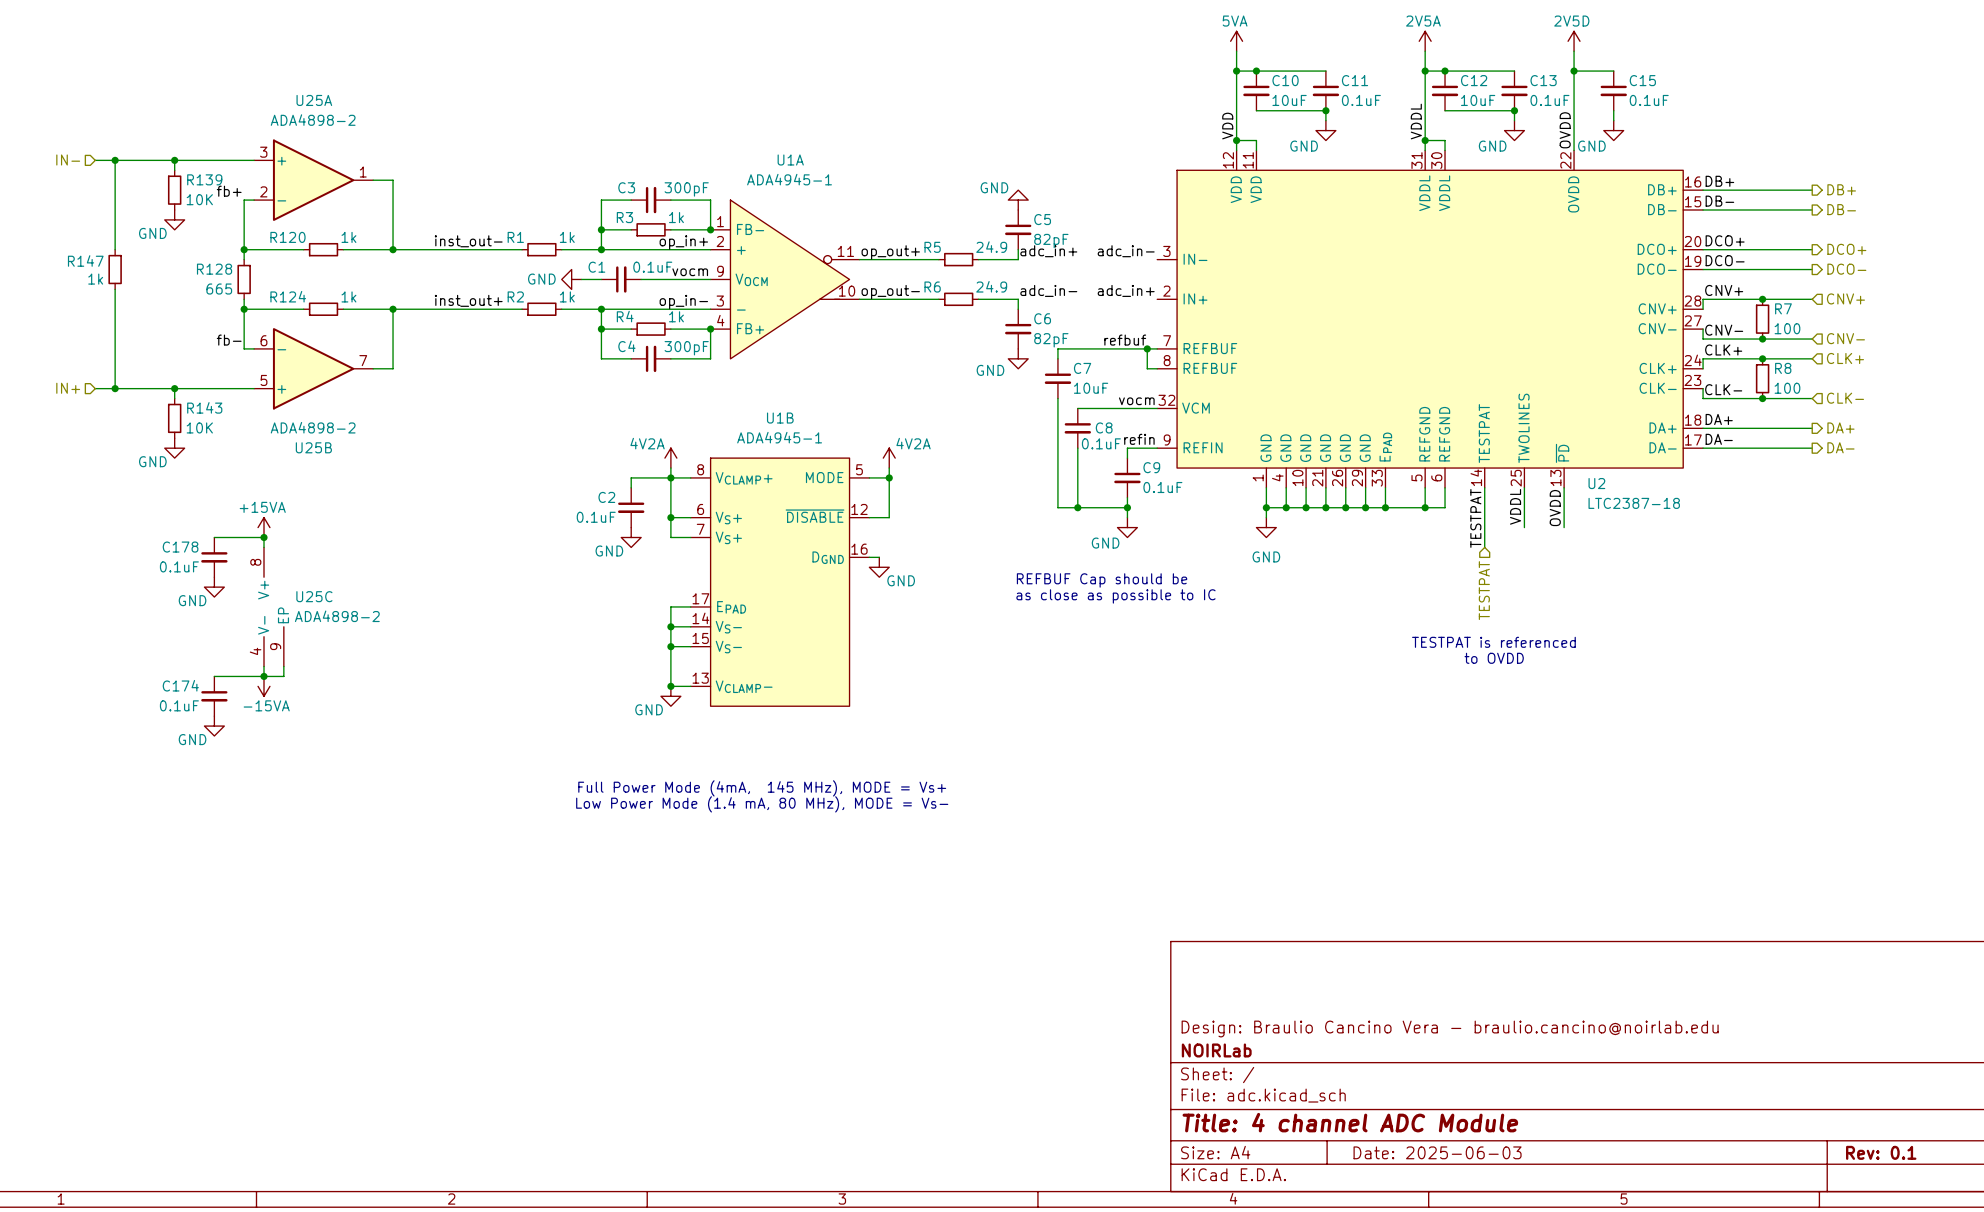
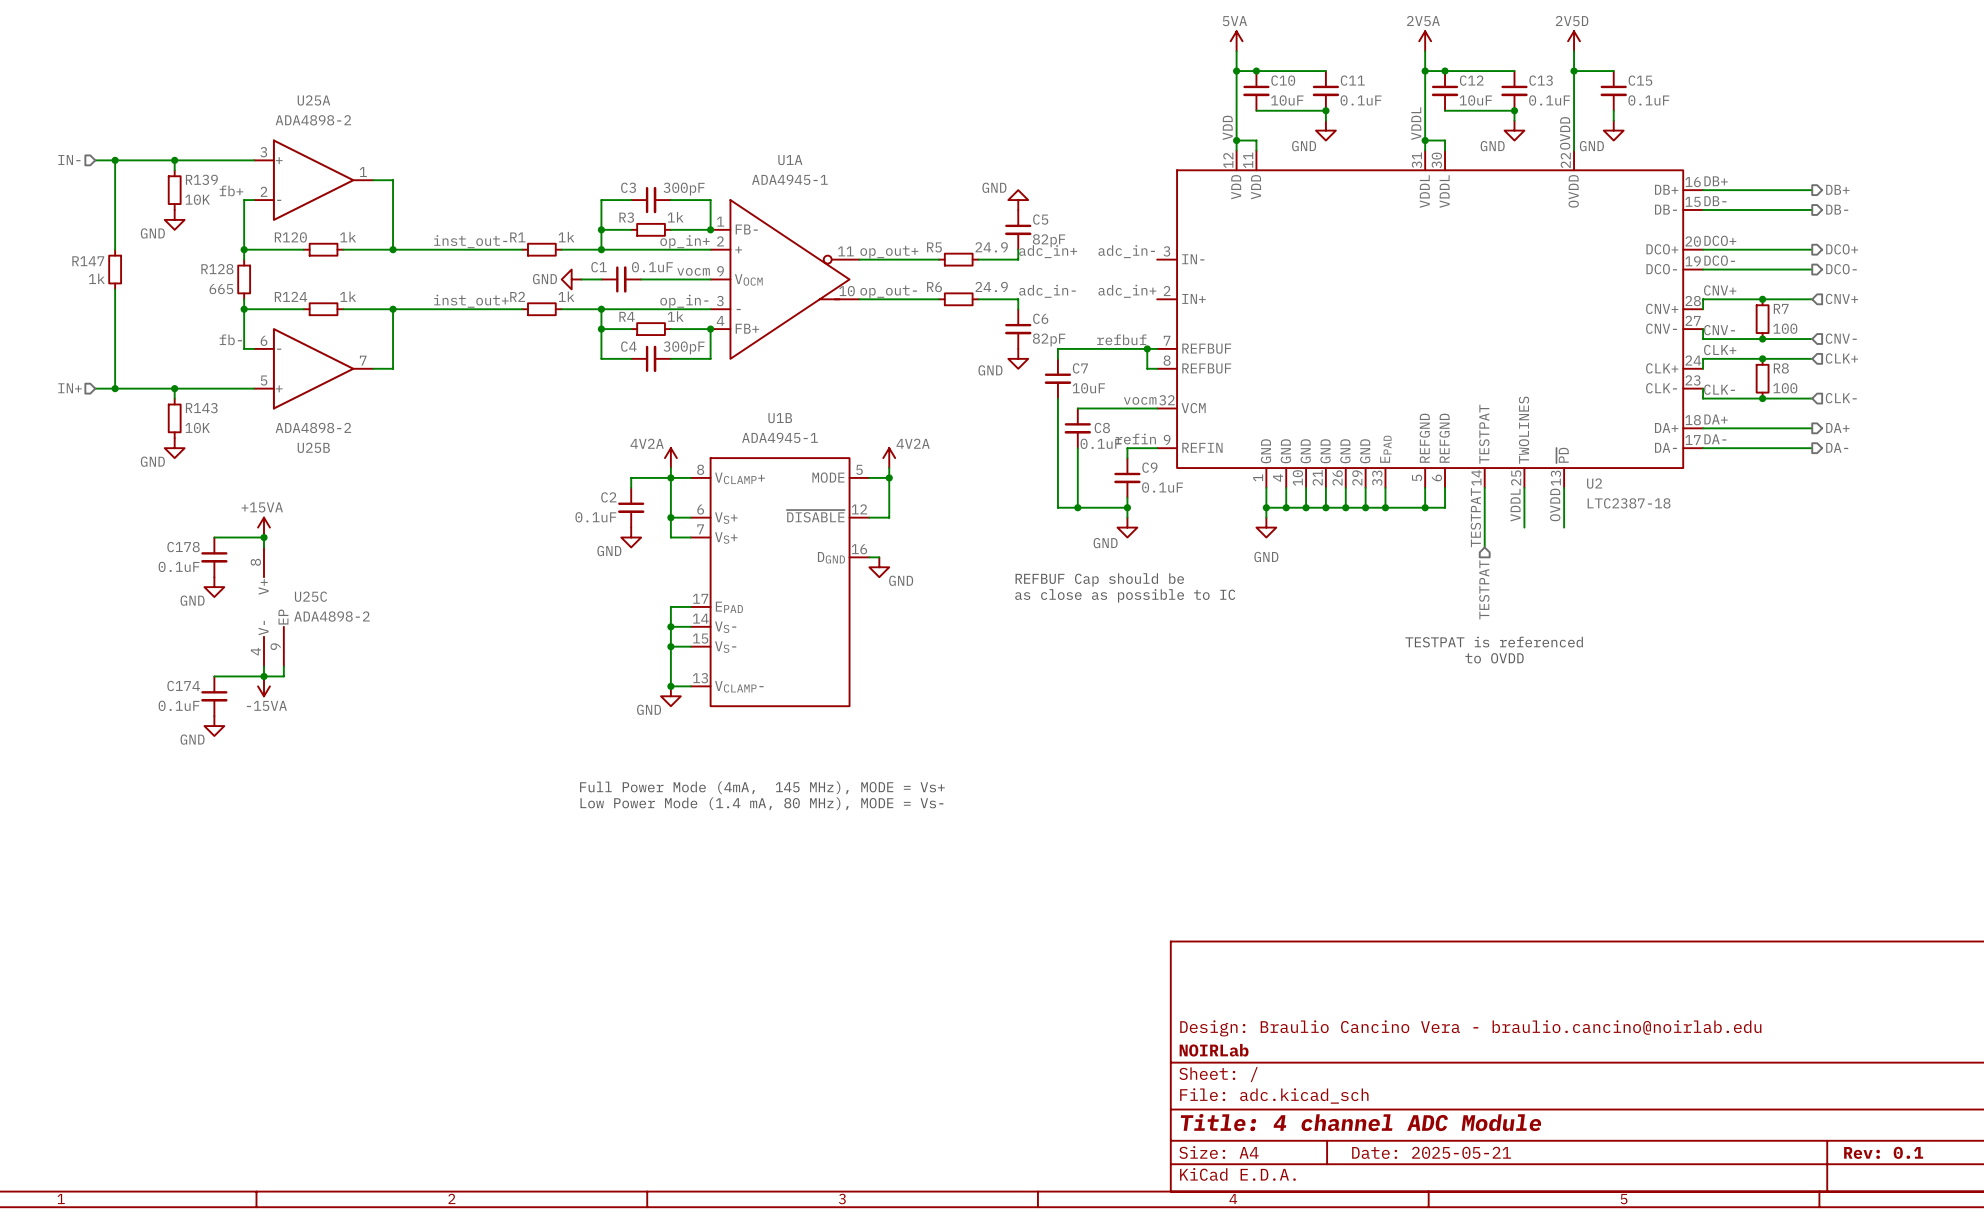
title block: Date: 2025-06-03 (1437, 1152) -> Date: 2025-05-21 (1431, 1152)

